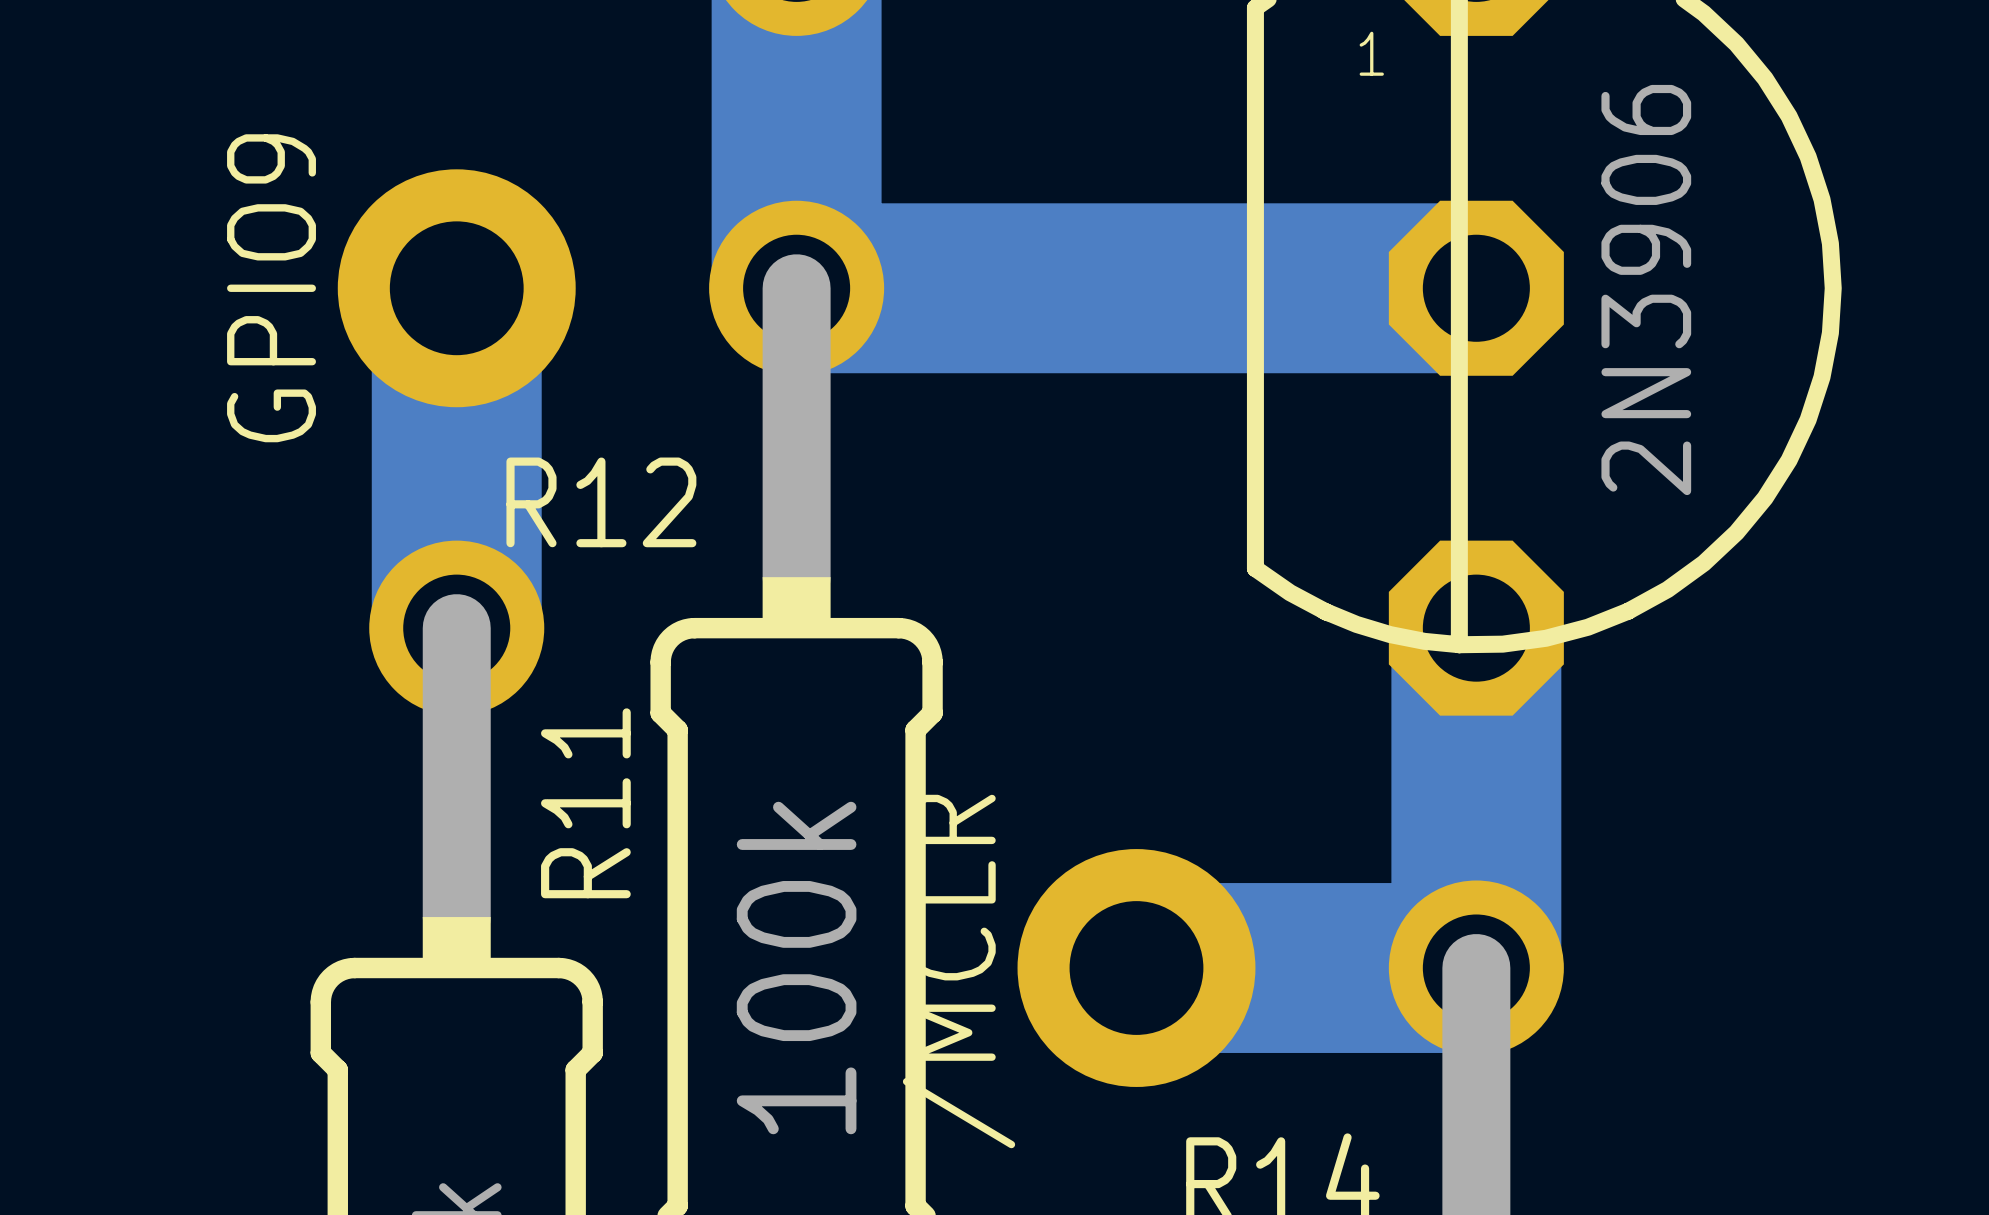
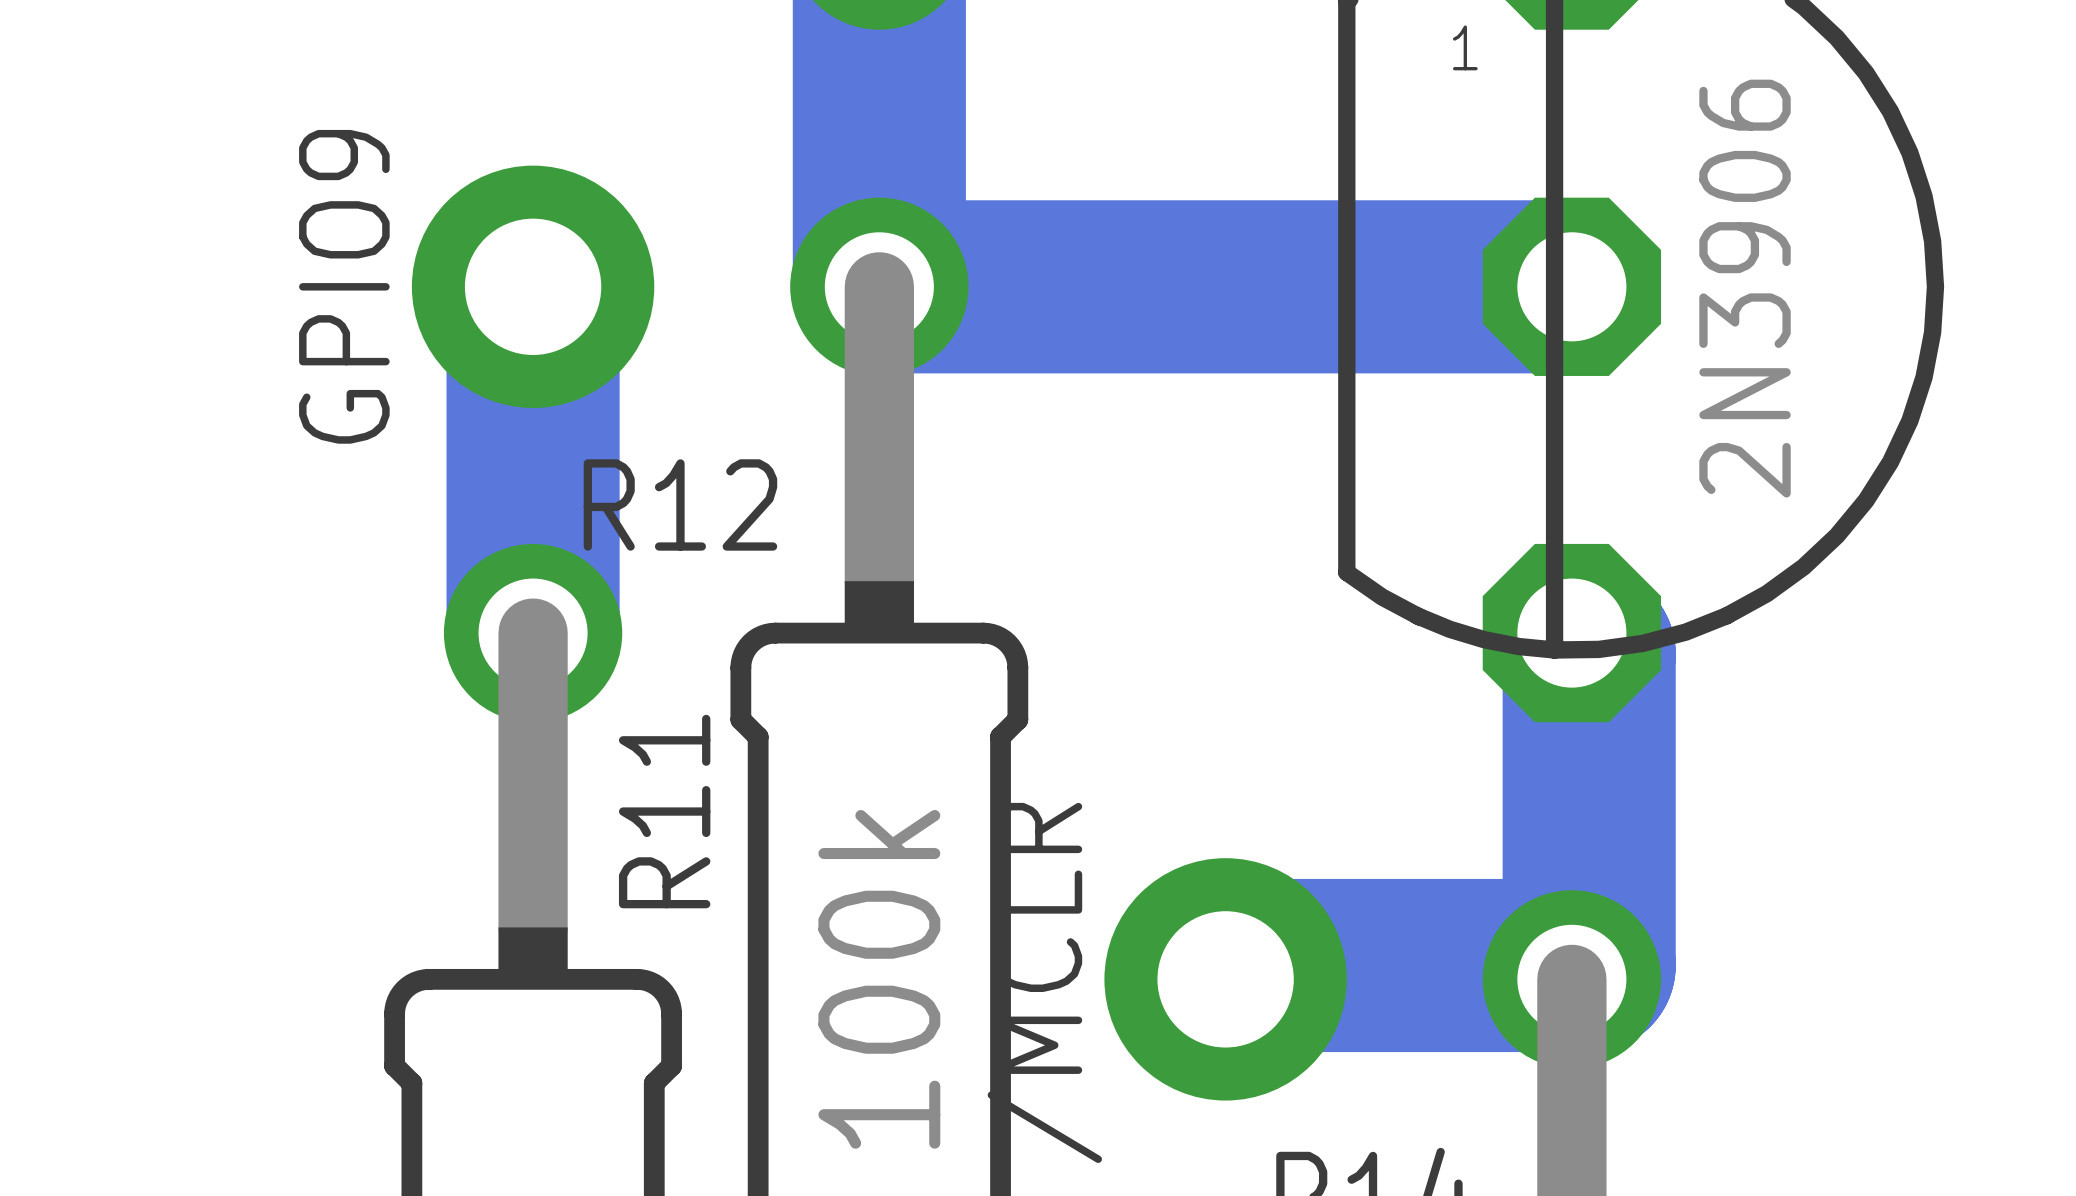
bottom track: (1476, 628) (1476, 968) (1136, 968) -> (1571, 633) (1589, 653) (1589, 965) (1571, 979) (1558, 965) (1246, 965) (1225, 979)

